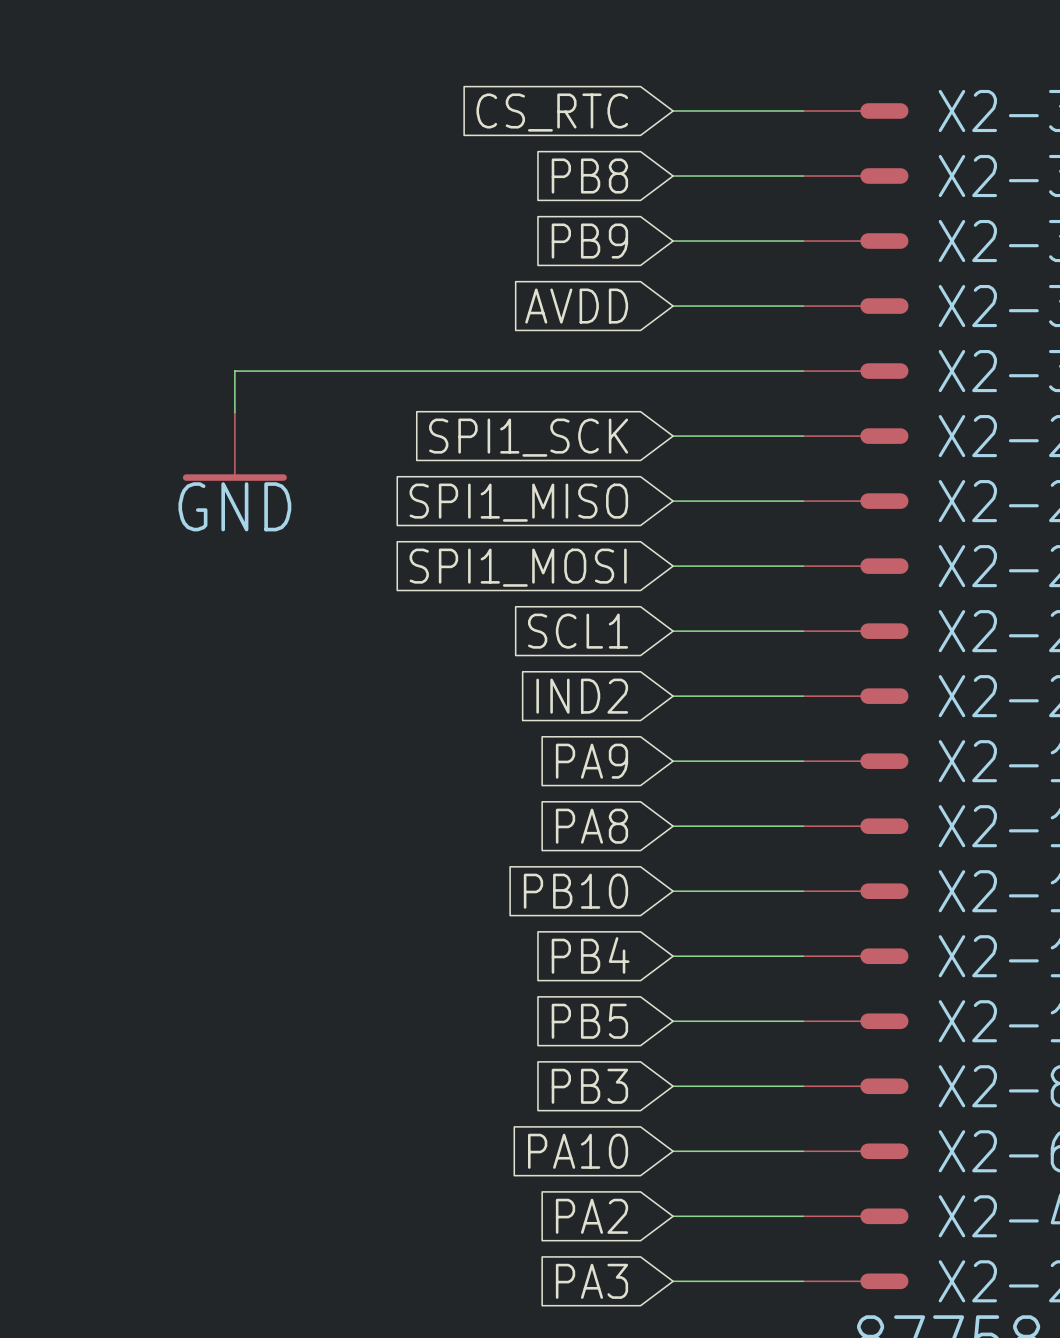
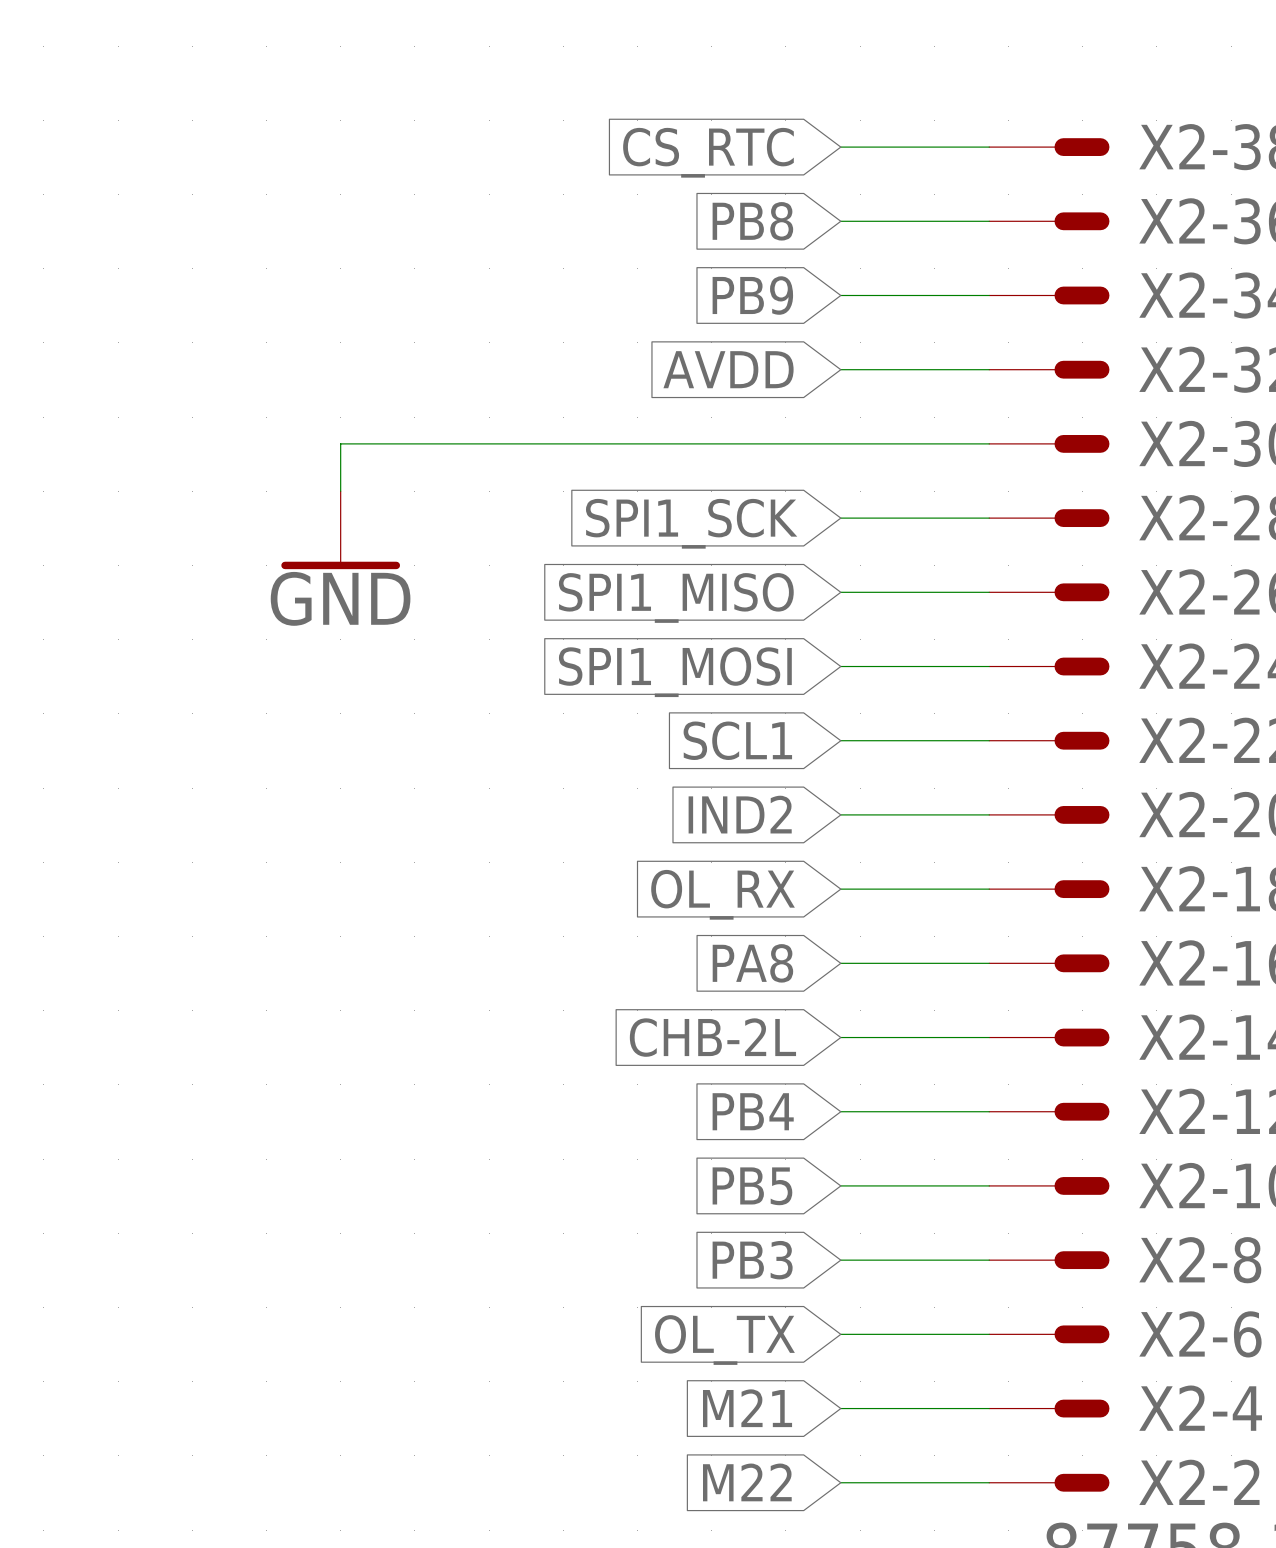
global label: PA9 (591, 761) -> OL_RX (723, 894)
global label: PB10 (575, 891) -> CHB-2L (712, 1037)
global label: PA10 (578, 1151) -> OL_TX (724, 1340)
global label: PA2 (591, 1216) -> M21 (747, 1408)
global label: PA3 (591, 1281) -> M22 (747, 1482)

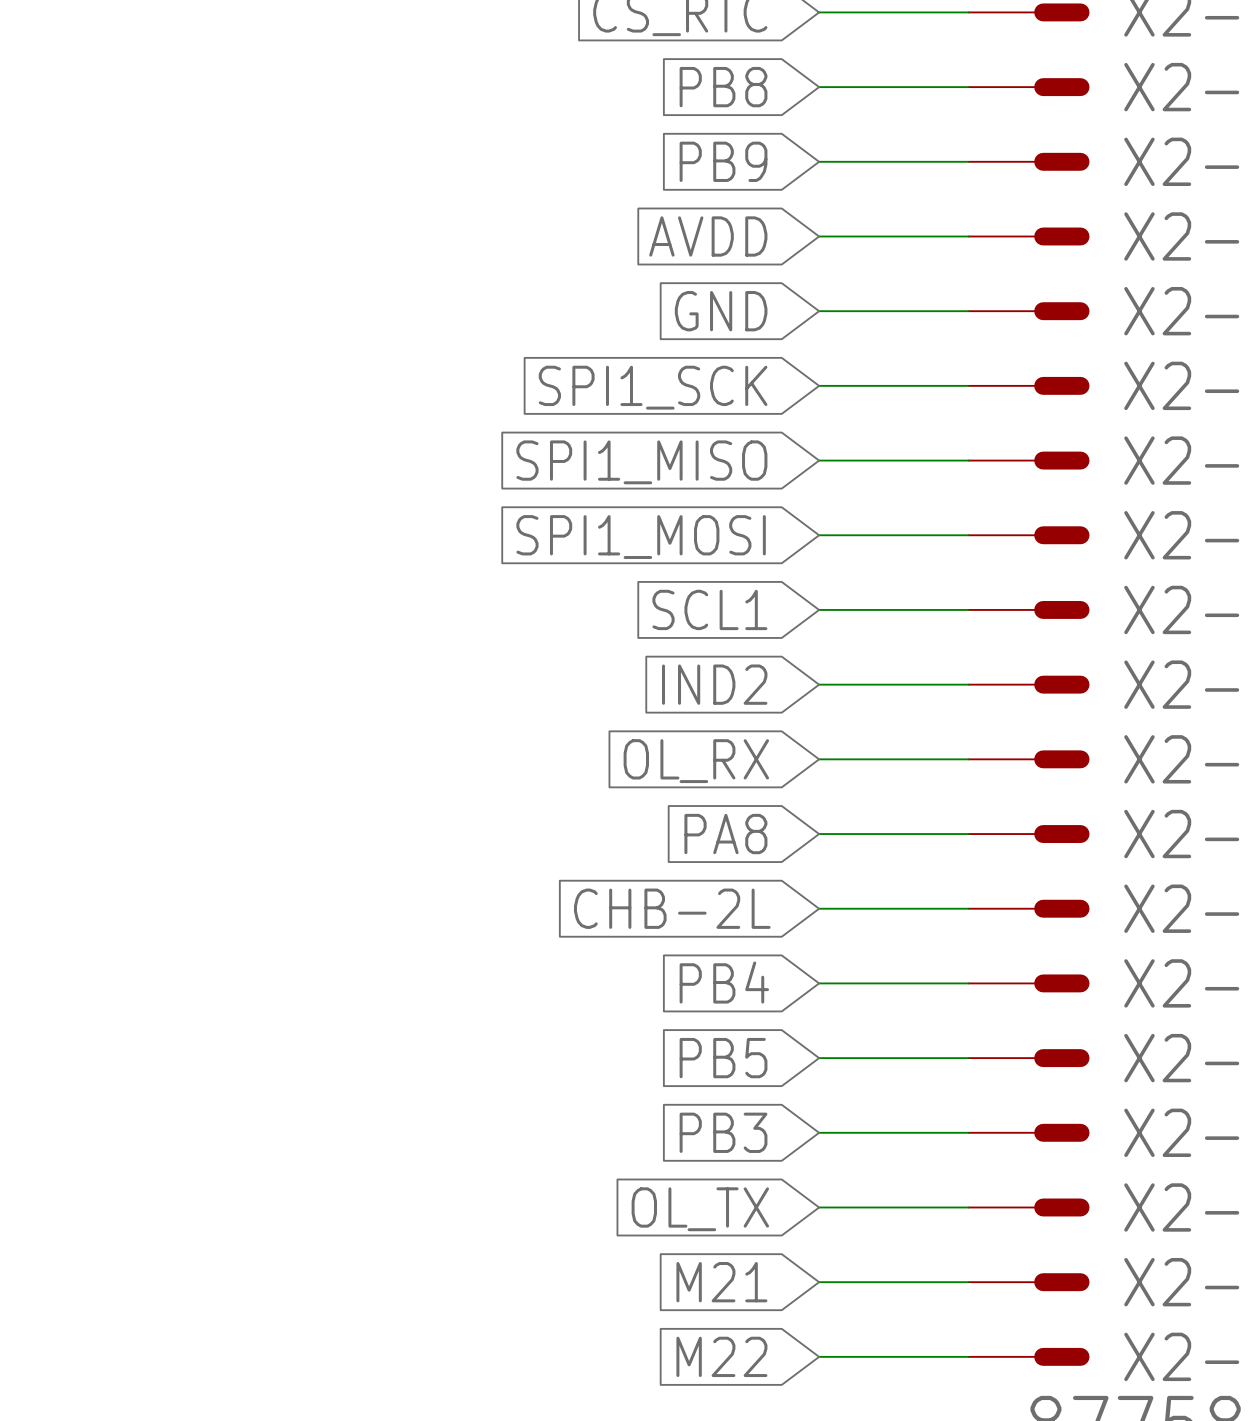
global label: none -> GND (721, 311)
wire: (840, 443) (340, 443) (340, 491) -> none
power symbol: GND (340, 530) -> none

